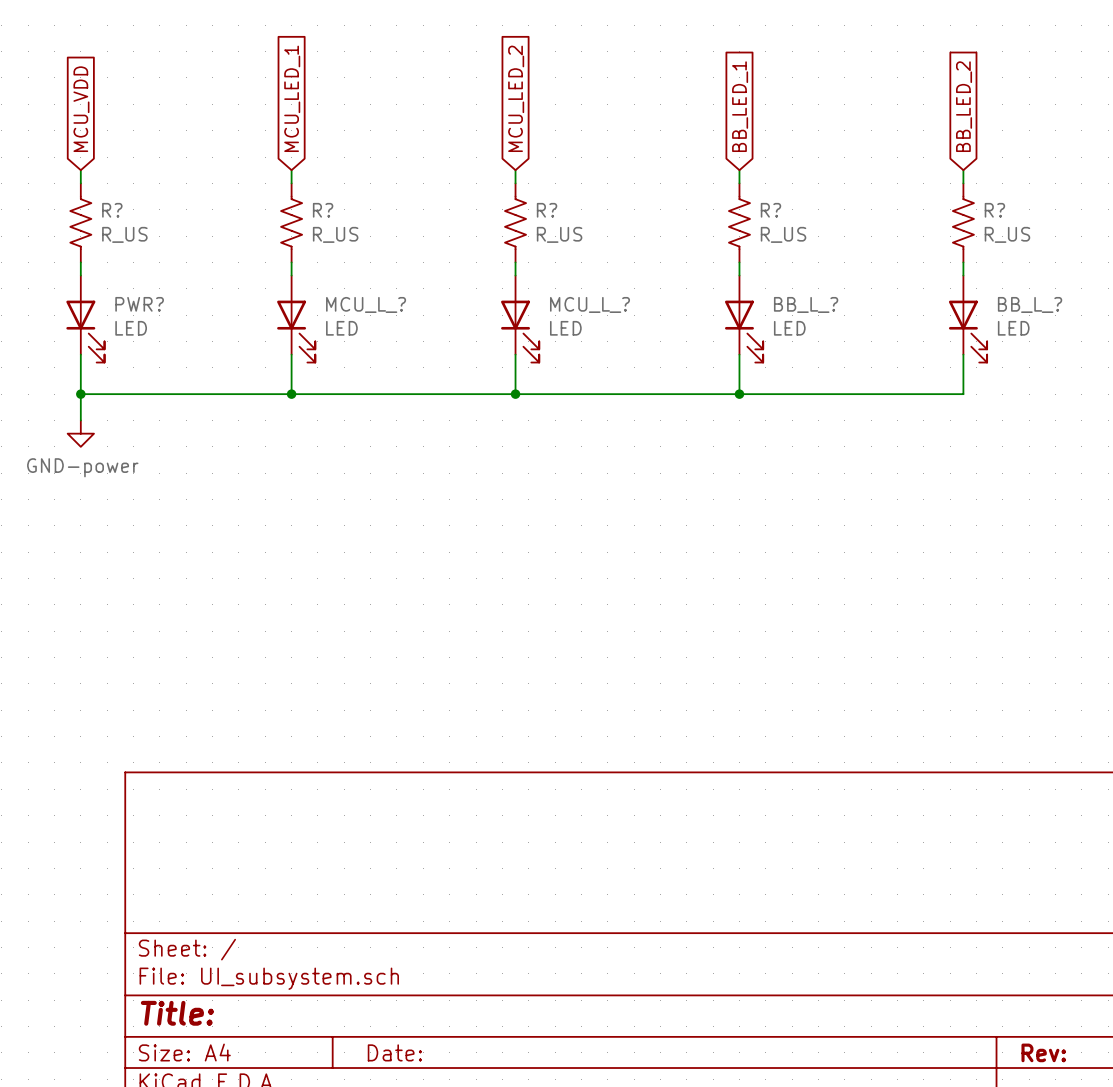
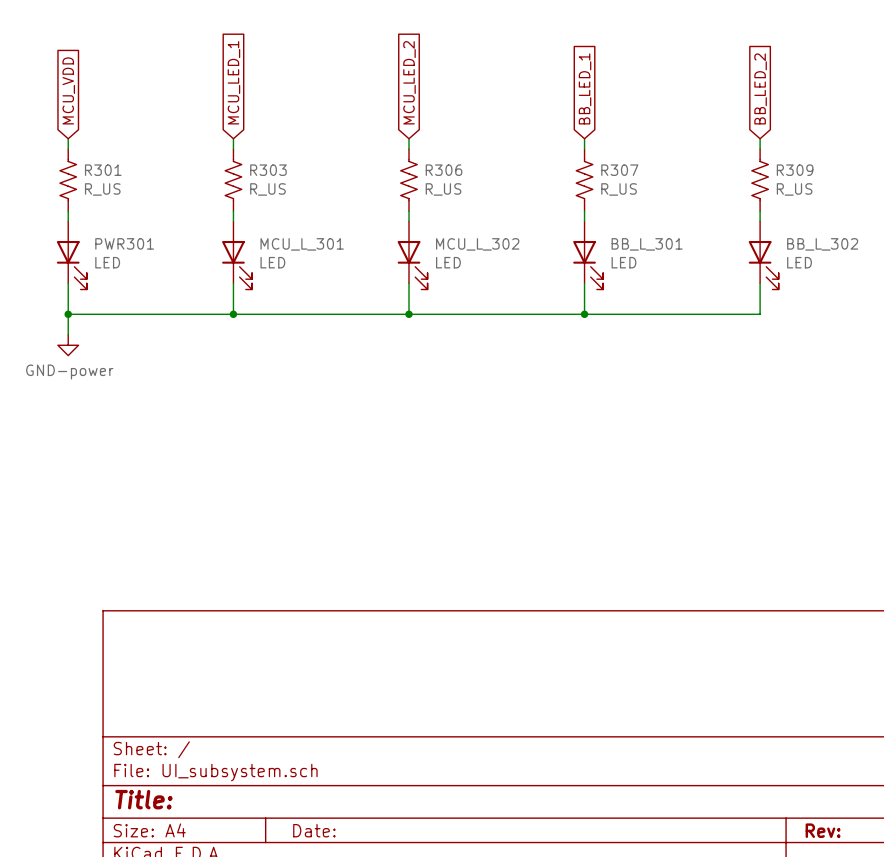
R? name: R? (112, 210) -> R301 (103, 170)
R? name: R? (323, 210) -> R303 (268, 170)
R? name: R? (547, 210) -> R306 (444, 170)
R? name: R? (770, 210) -> R307 (619, 170)
R? name: R? (994, 210) -> R309 (795, 170)
PWR? name: PWR? (139, 304) -> PWR301 (124, 243)
MCU_L_? name: MCU_L_? (366, 304) -> MCU_L_301 (302, 244)
MCU_L_? name: MCU_L_? (590, 304) -> MCU_L_302 (477, 244)
BB_L_? name: BB_L_? (806, 304) -> BB_L_301 (647, 244)
BB_L_? name: BB_L_? (1030, 304) -> BB_L_302 (822, 244)

